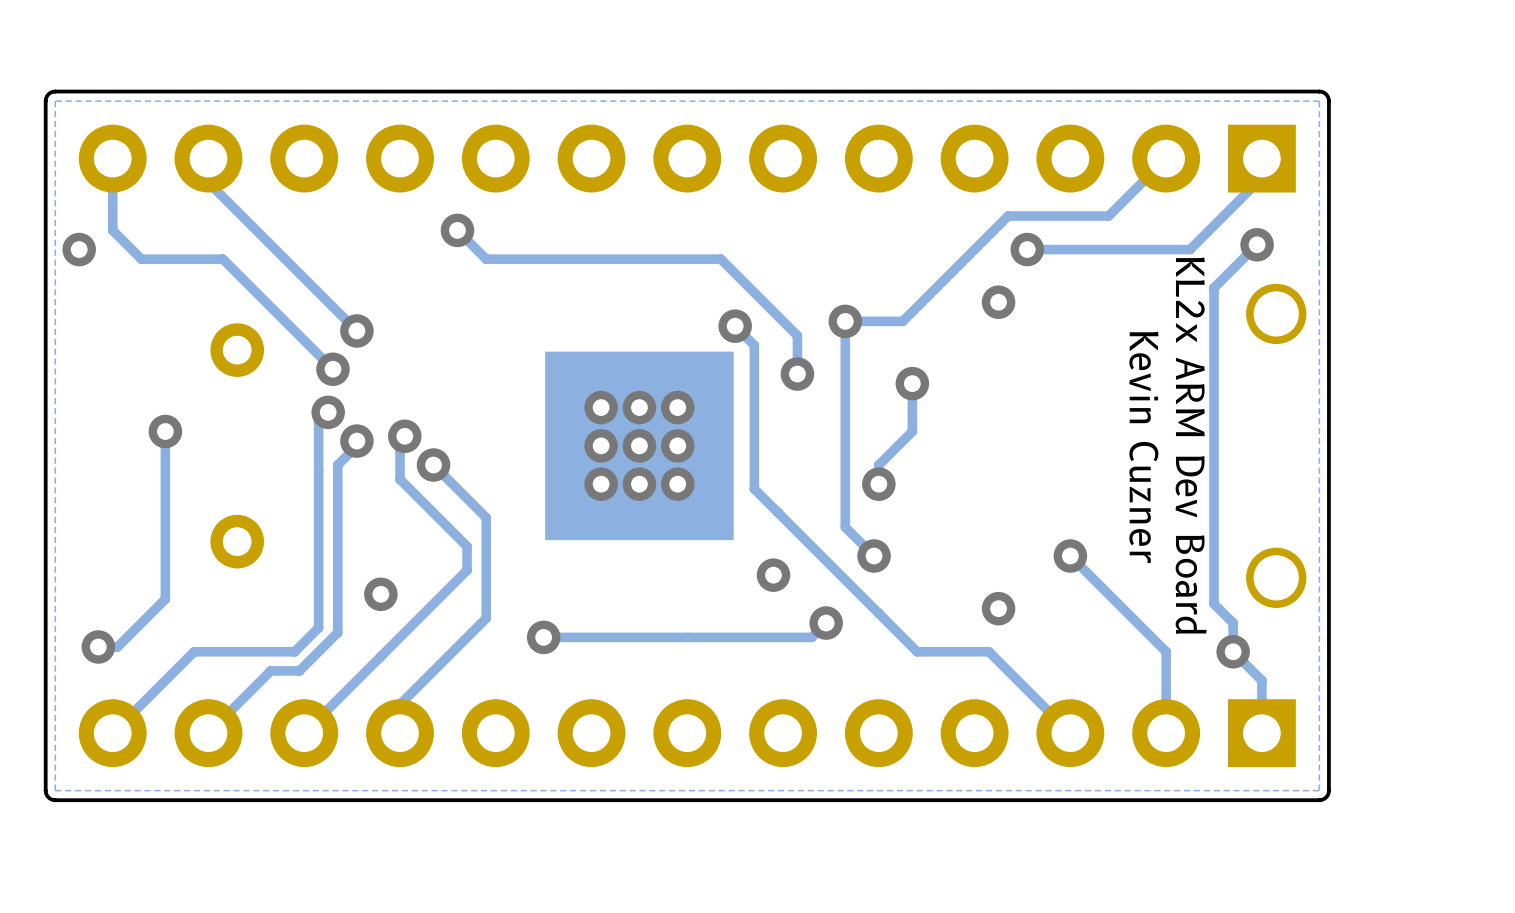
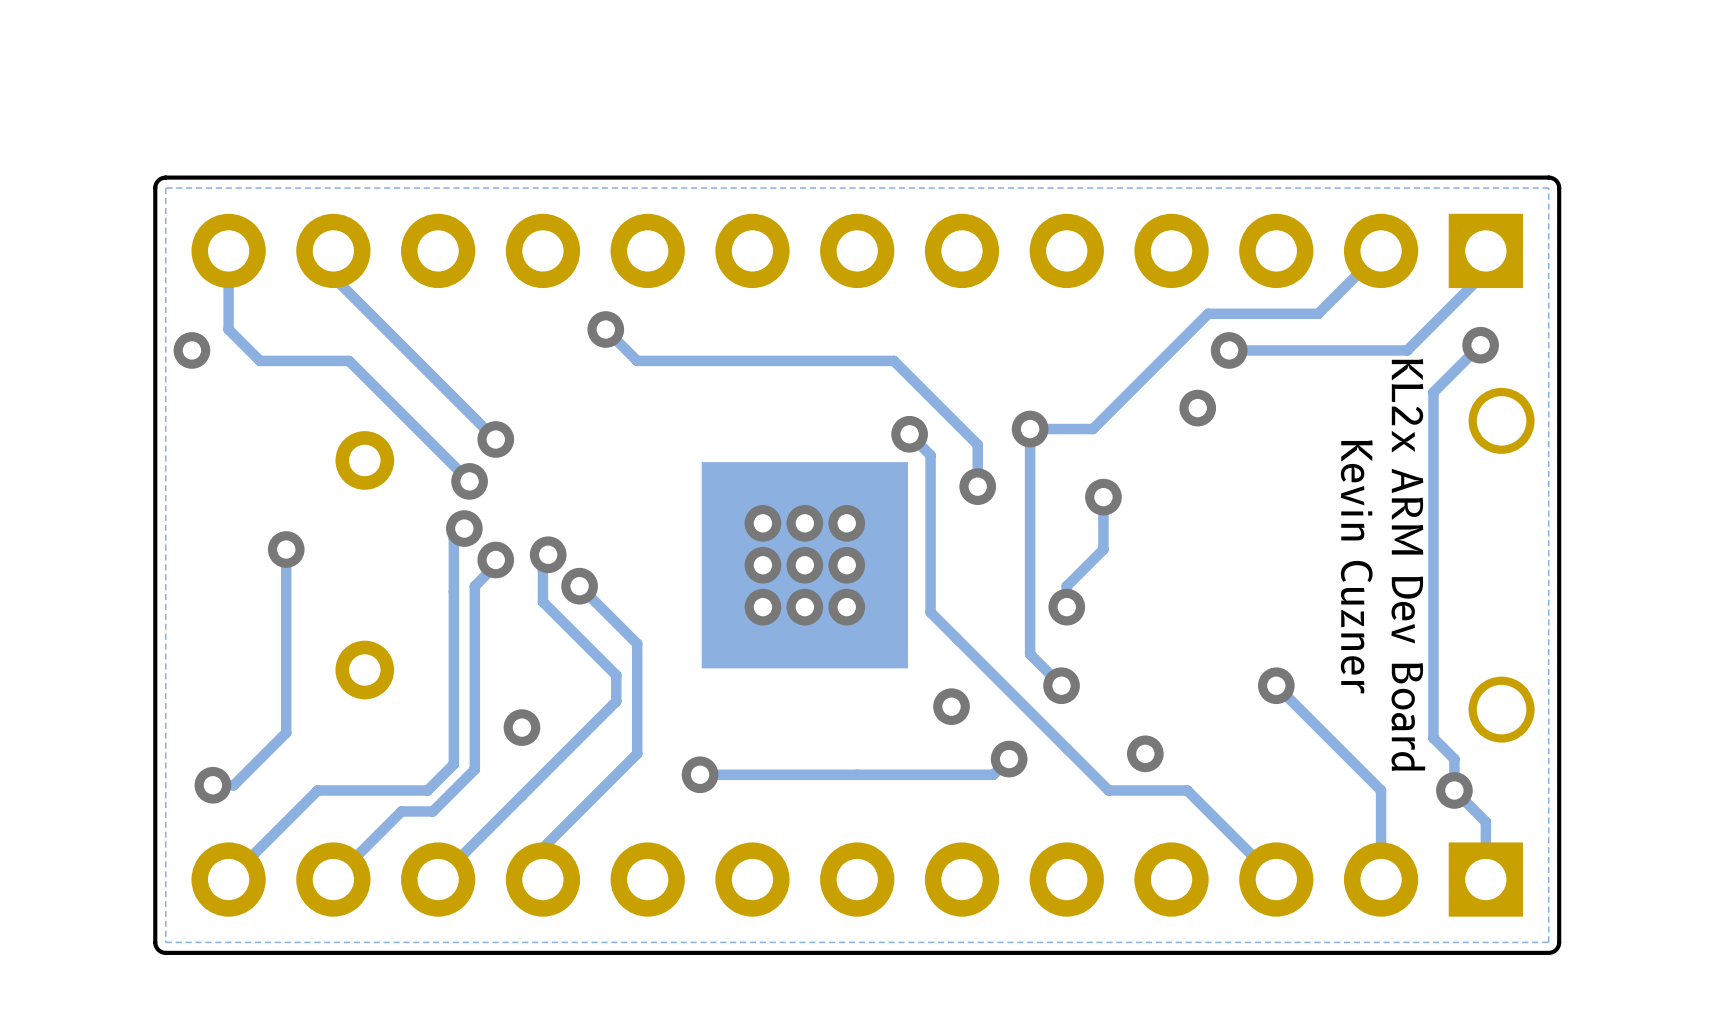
via position: (998, 608) -> (1145, 753)

